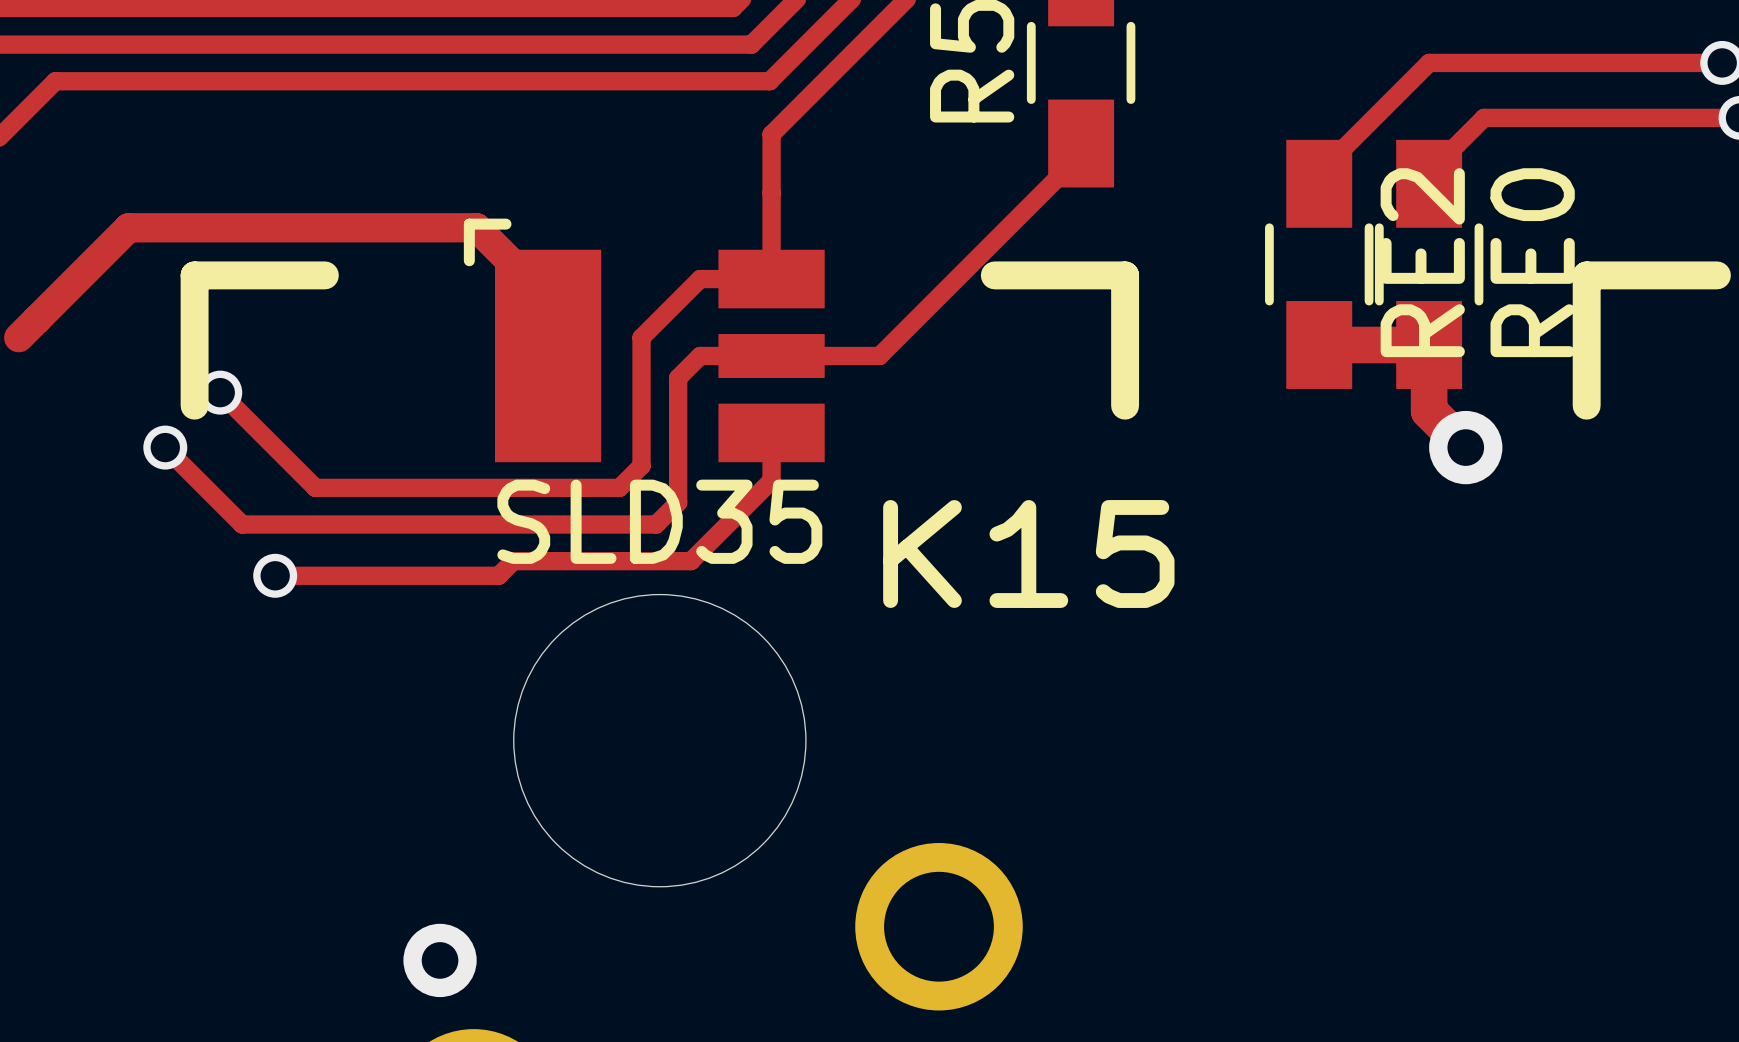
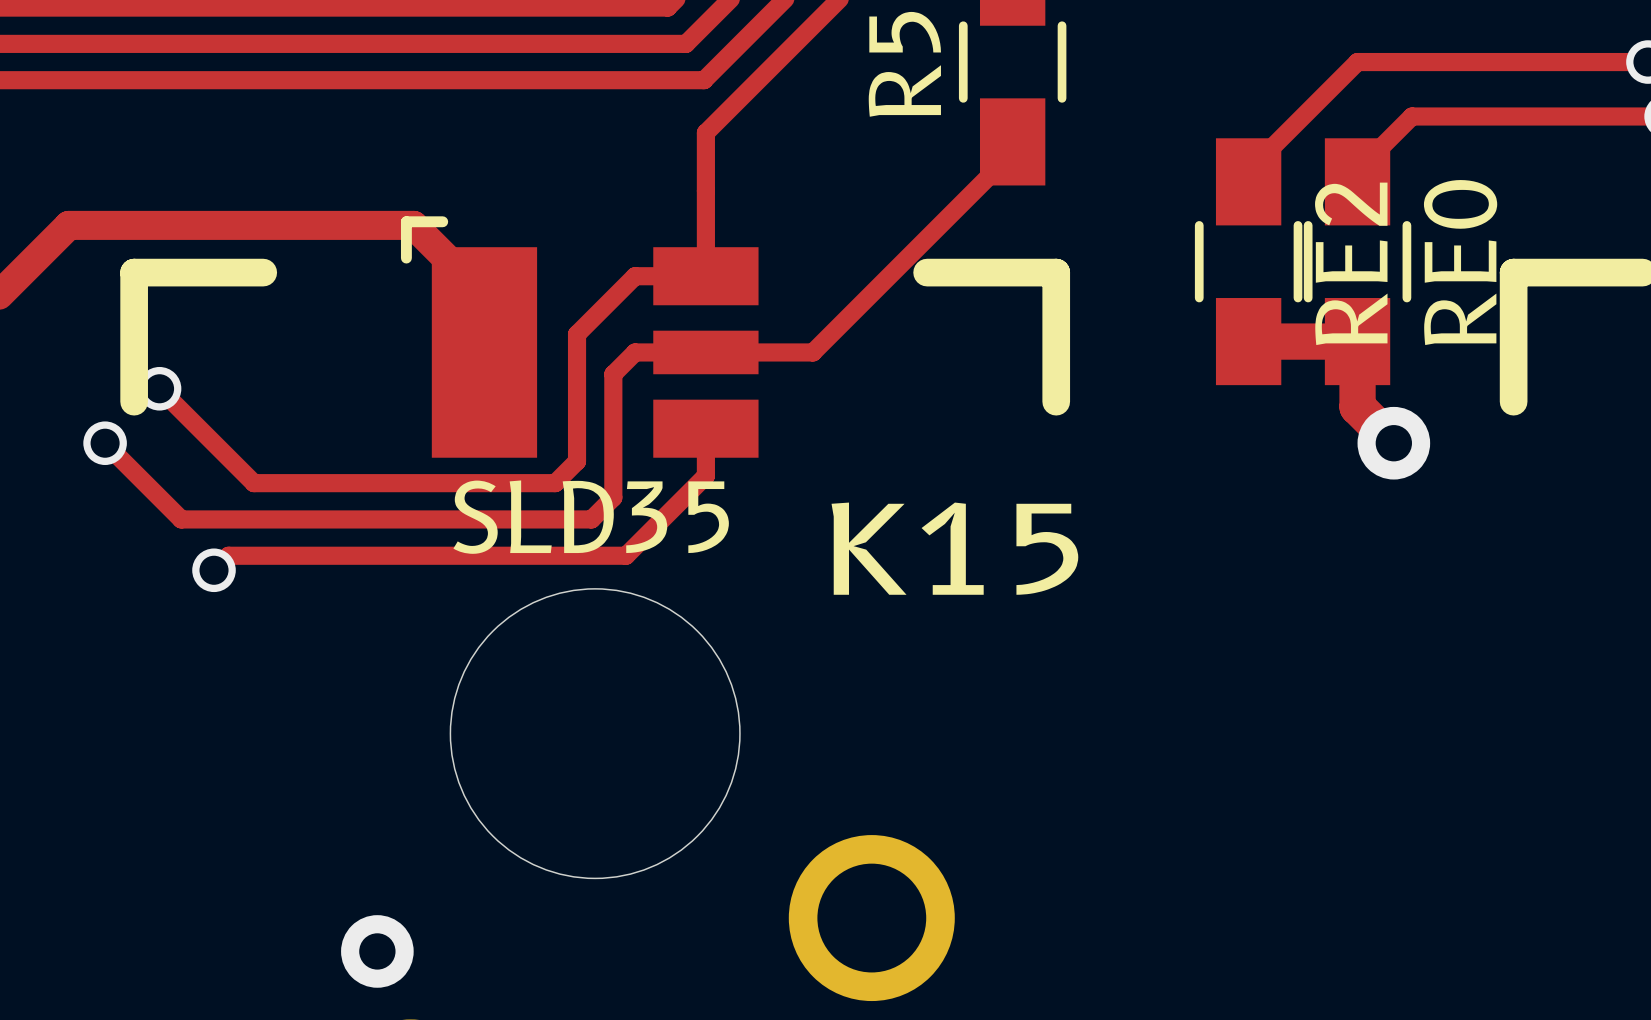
track: (513, 561) (498, 575) (275, 575) -> (449, 555) (228, 555) (214, 570)

